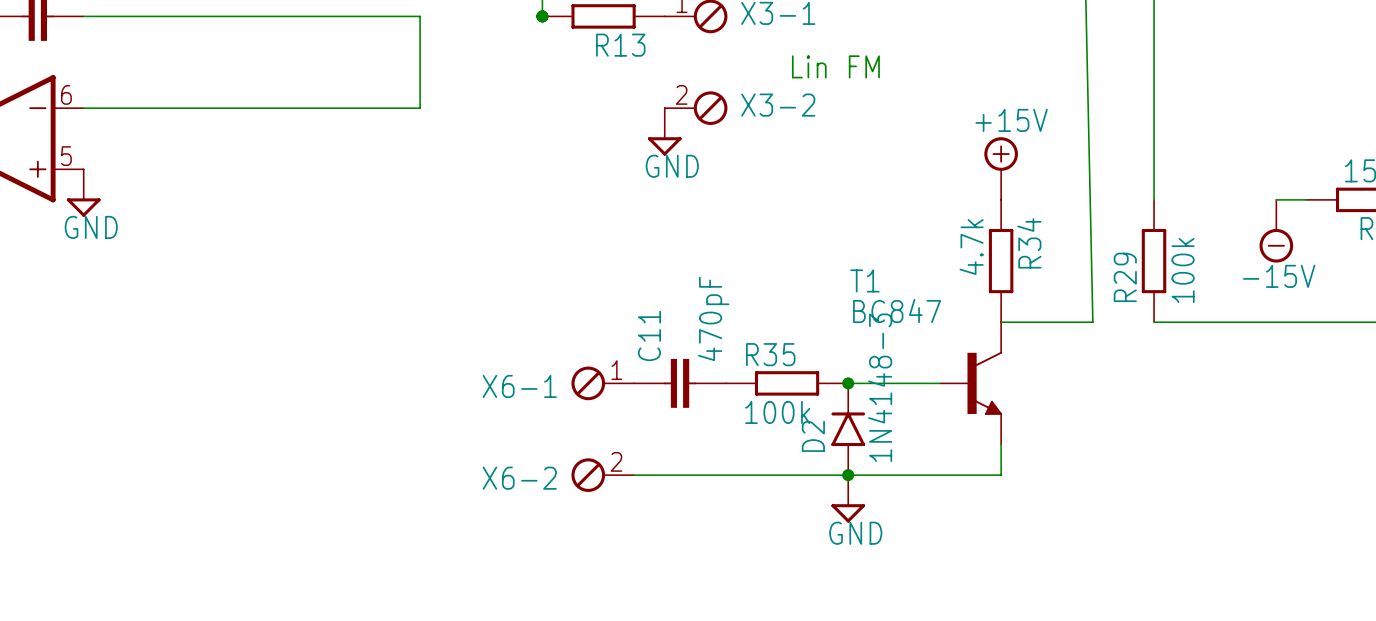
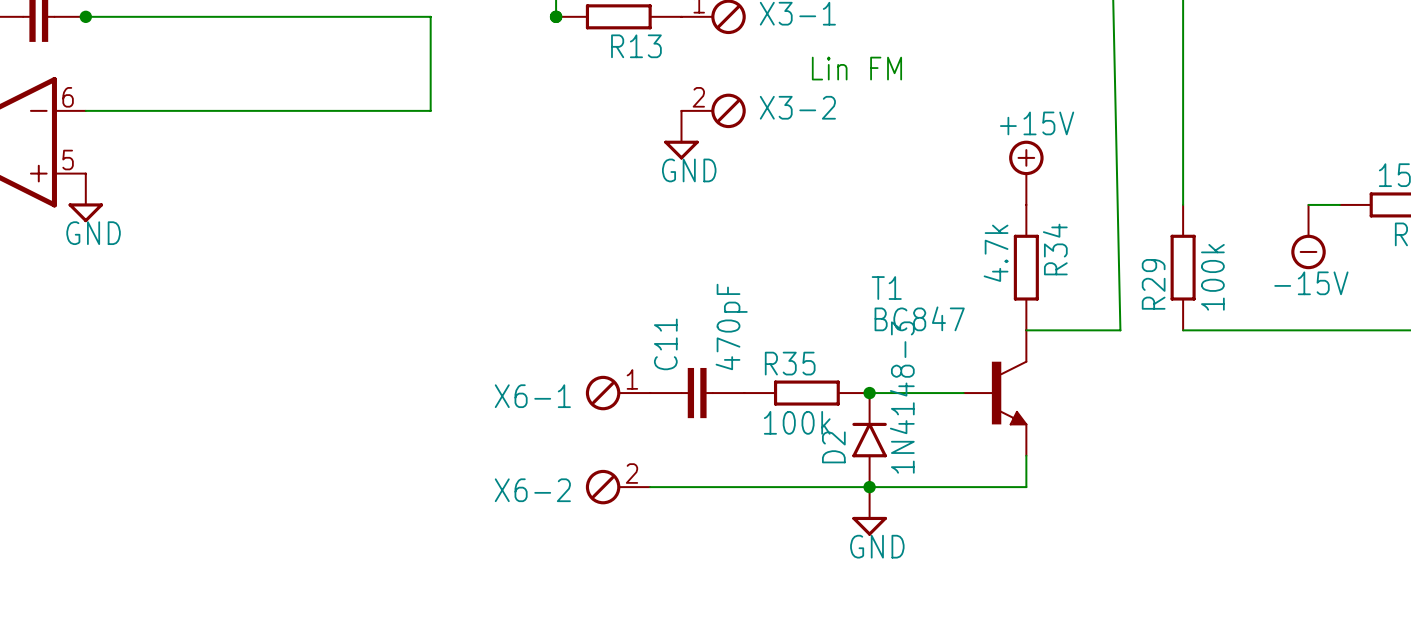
junction: none -> (85, 16)

